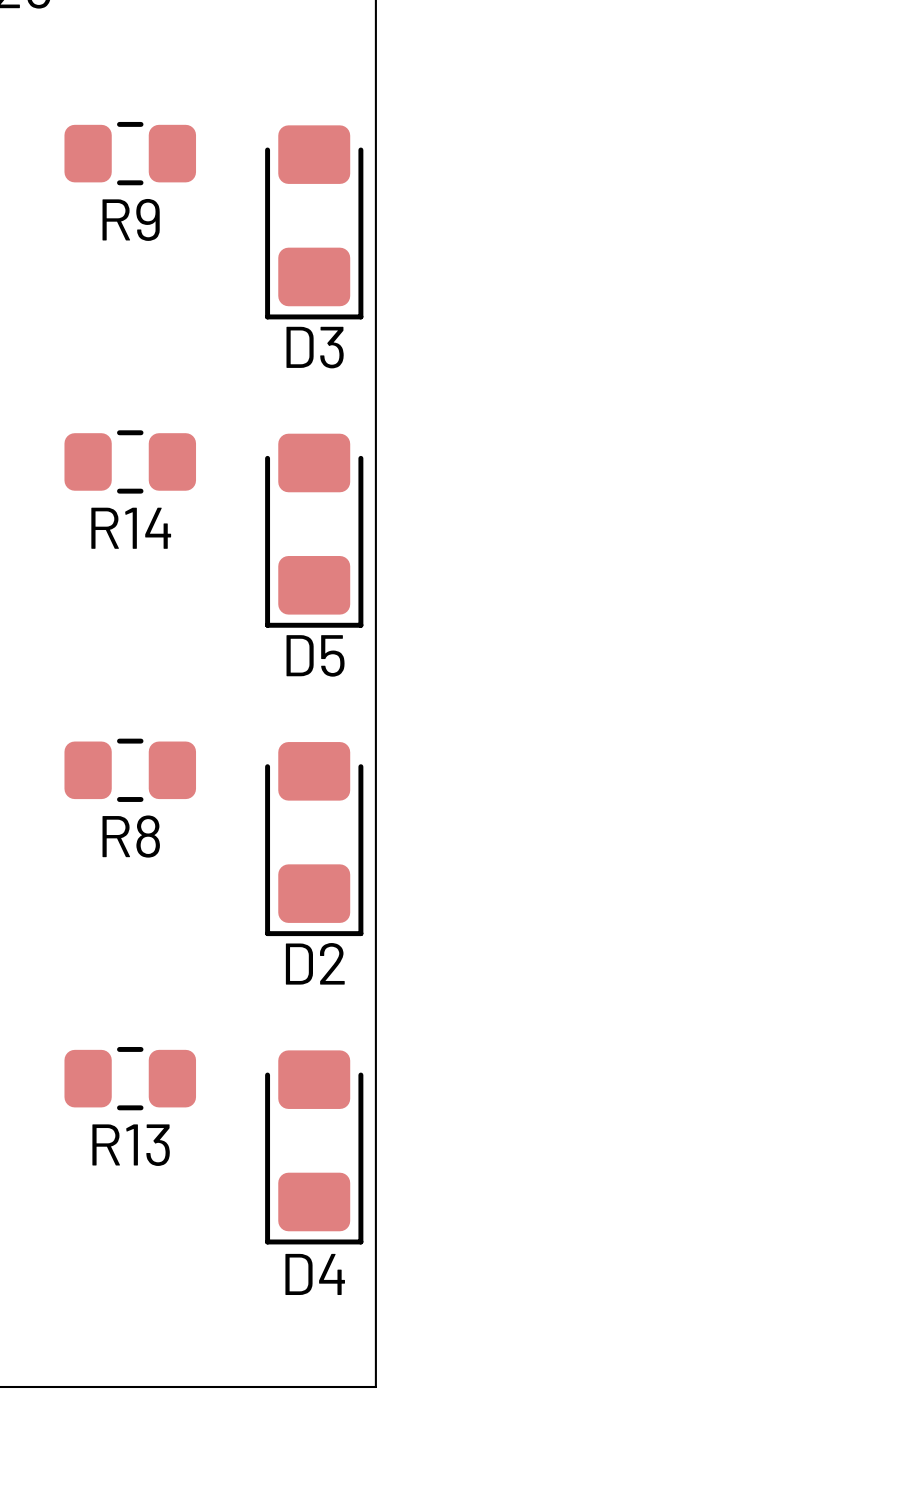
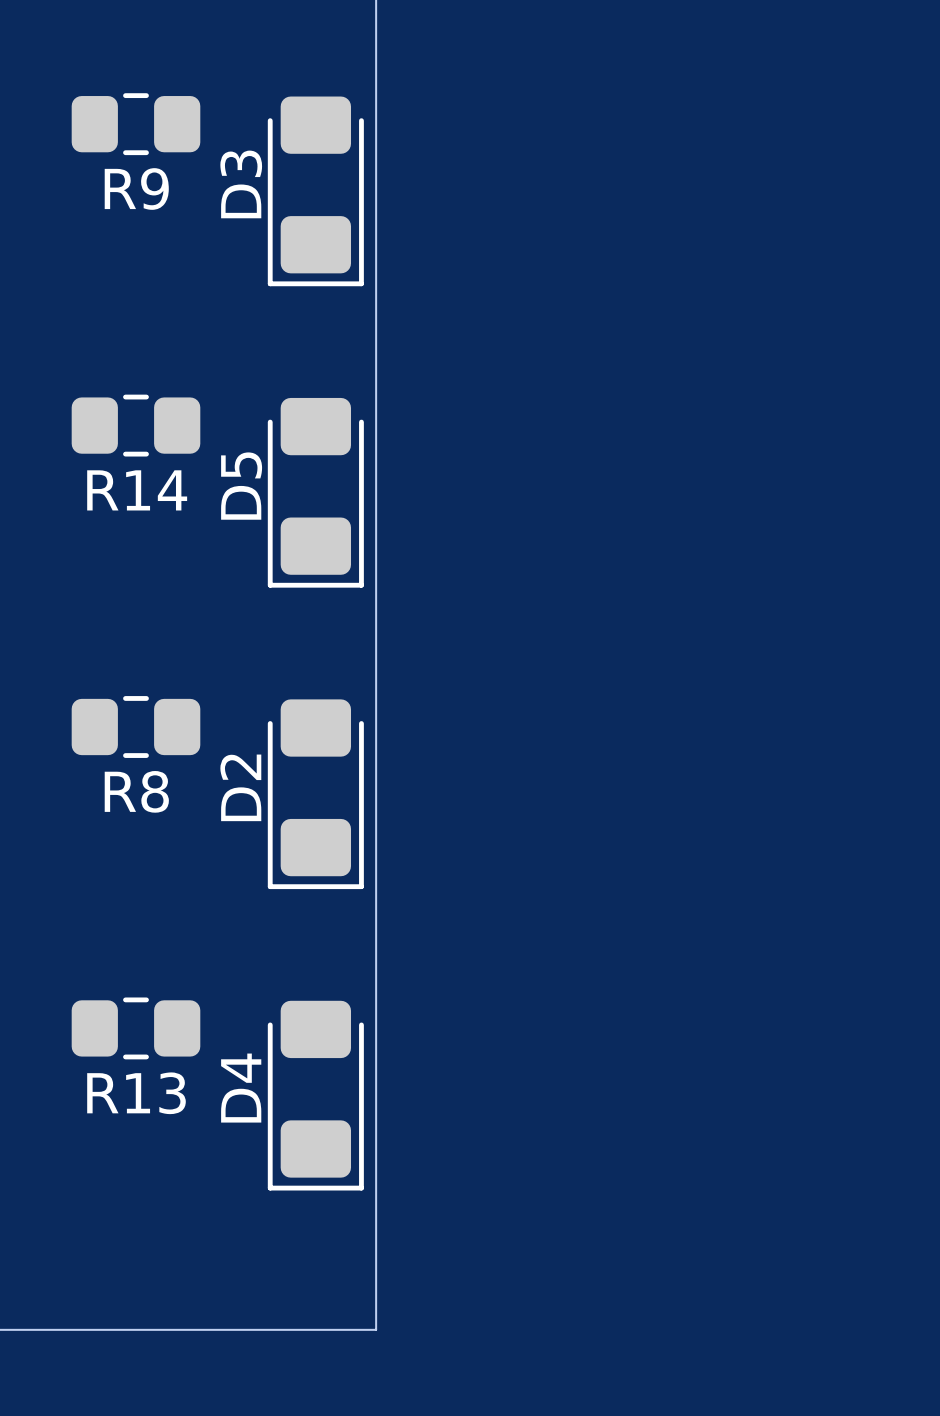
D3 name rotation: 0° (315, 347) -> 90° counterclockwise (241, 184)
D3 name position: D3 (315, 347) -> D3 (241, 184)
D5 name rotation: 0° (315, 655) -> 90° counterclockwise (241, 486)
D5 name position: D5 (315, 655) -> D5 (241, 486)
D2 name rotation: 0° (315, 963) -> 90° counterclockwise (240, 787)
D2 name position: D2 (315, 963) -> D2 (240, 787)
D4 name rotation: 0° (315, 1274) -> 90° counterclockwise (241, 1088)
D4 name position: D4 (315, 1274) -> D4 (241, 1088)

